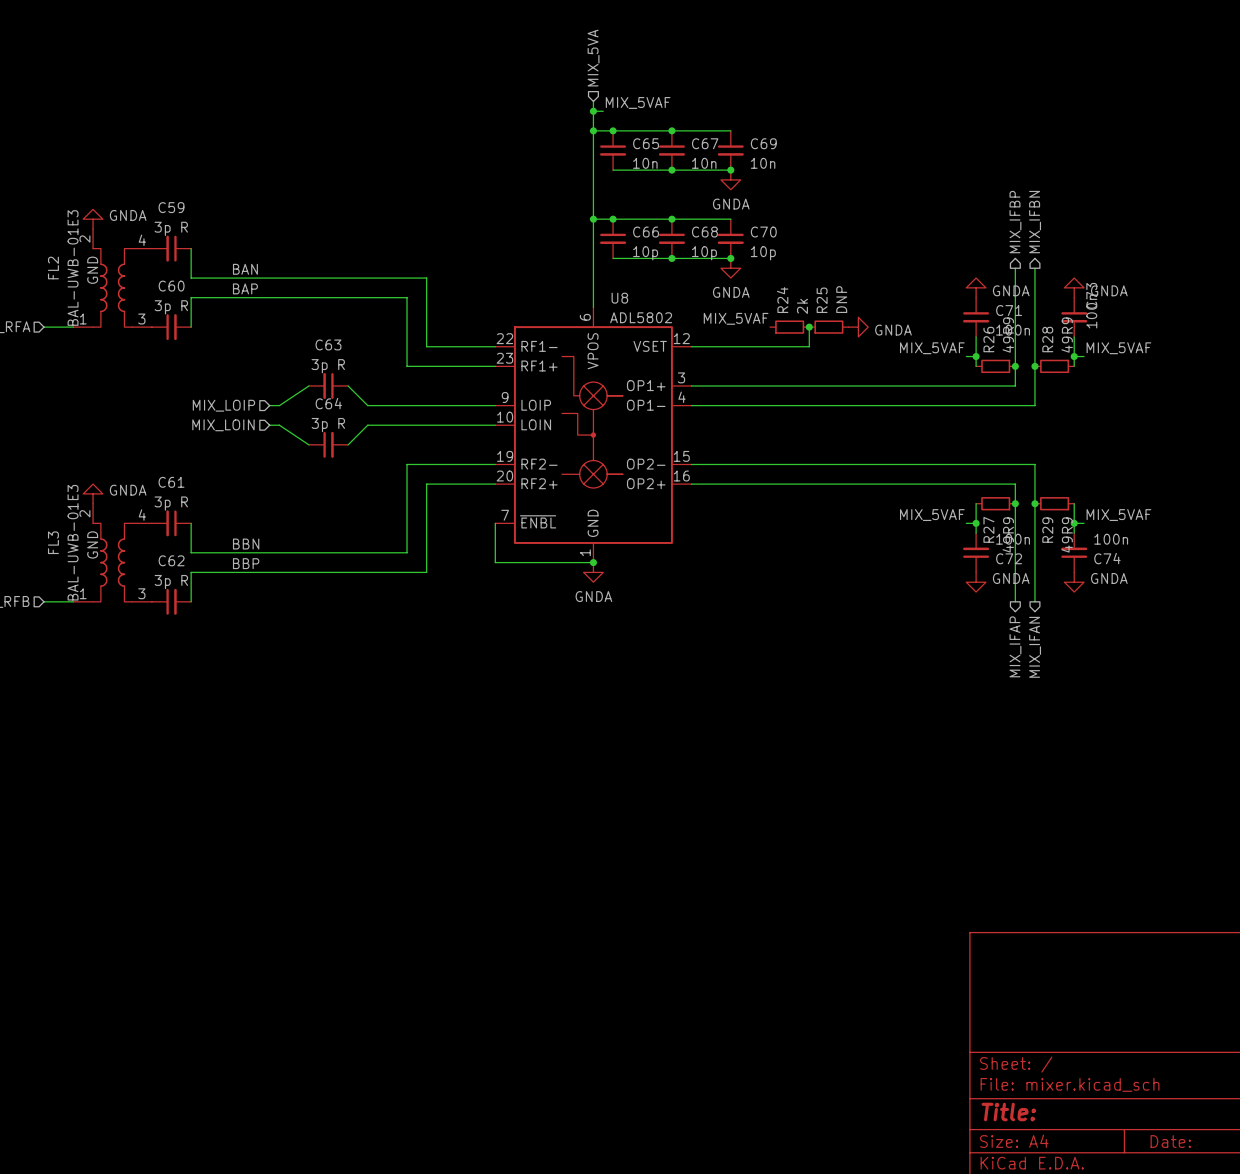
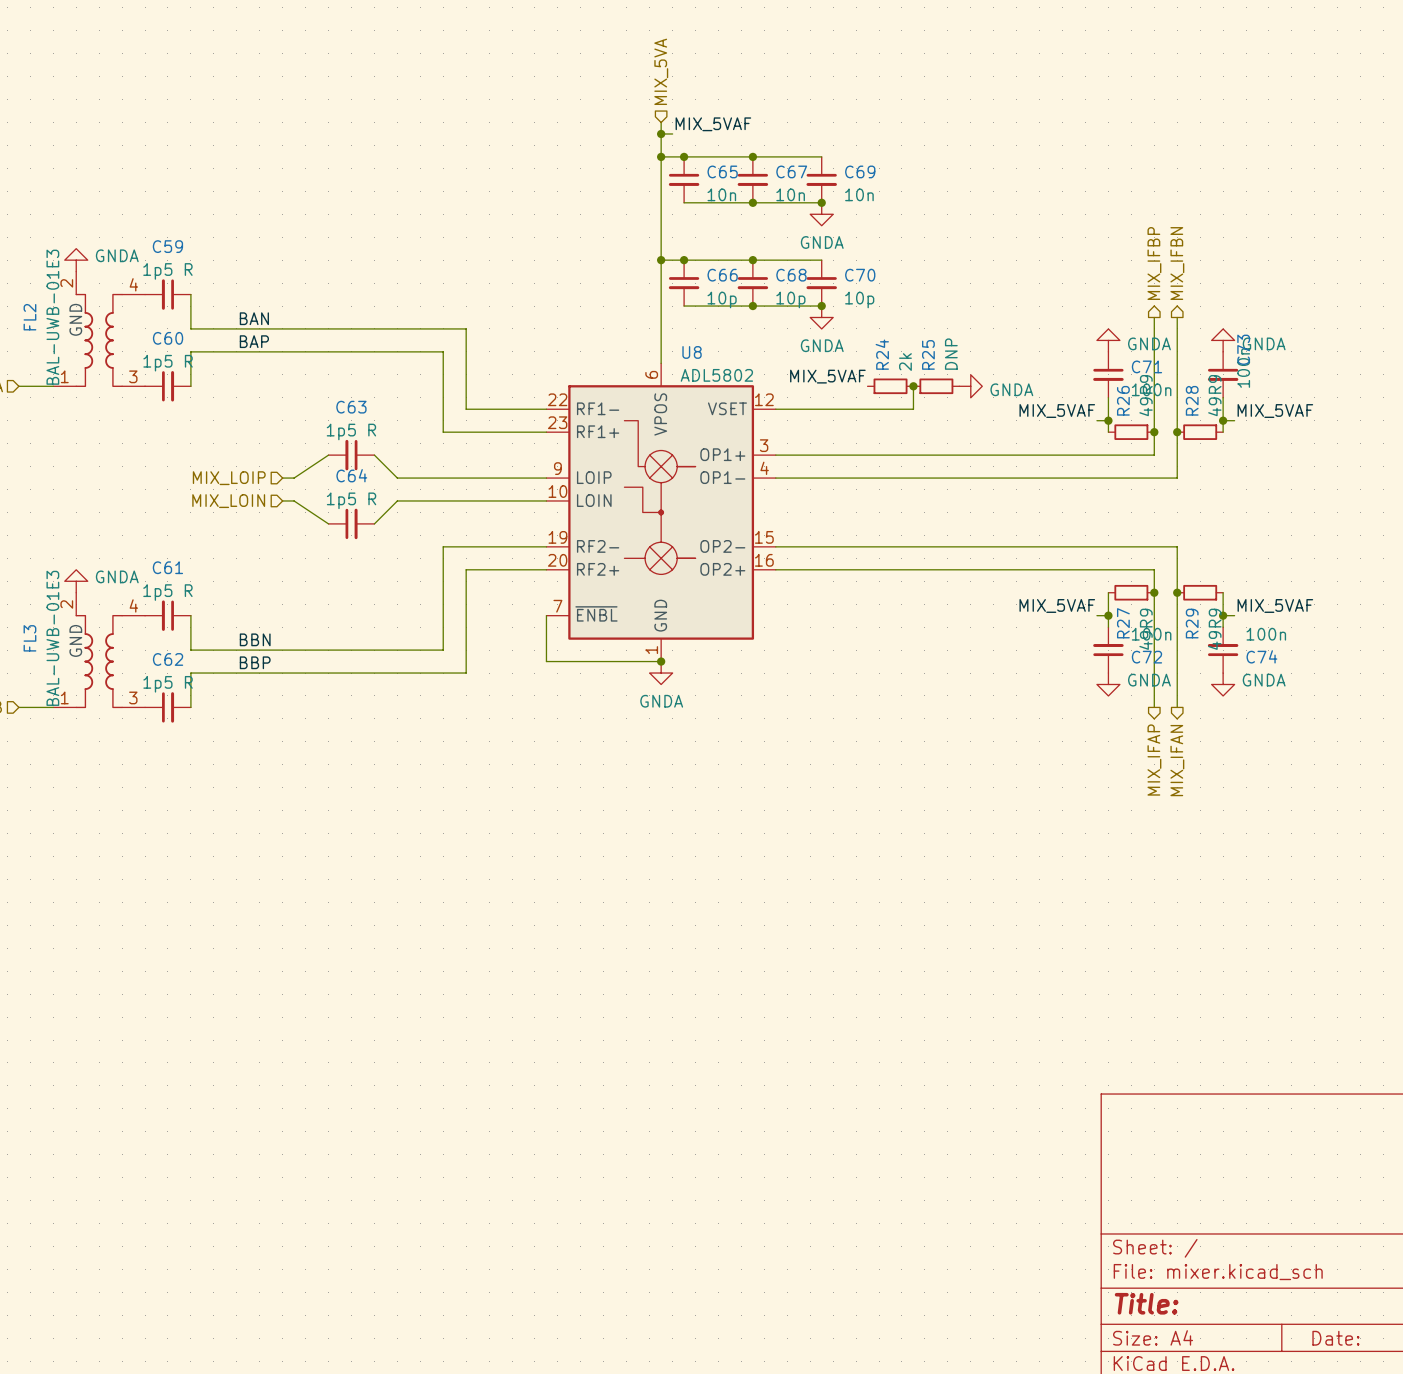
C59 value: 3p R (171, 228) -> 1p5 R (167, 271)
C60 value: 3p R (171, 307) -> 1p5 R (168, 363)
C63 value: 3p R (328, 366) -> 1p5 R (351, 431)
C64 value: 3p R (328, 425) -> 1p5 R (351, 500)
C61 value: 3p R (171, 503) -> 1p5 R (167, 592)
C62 value: 3p R (171, 582) -> 1p5 R (168, 684)

